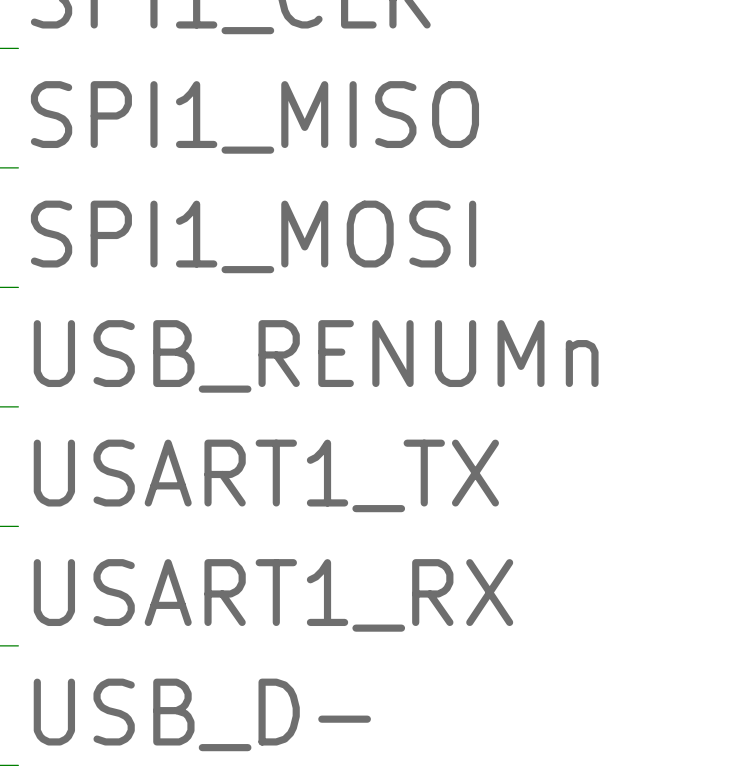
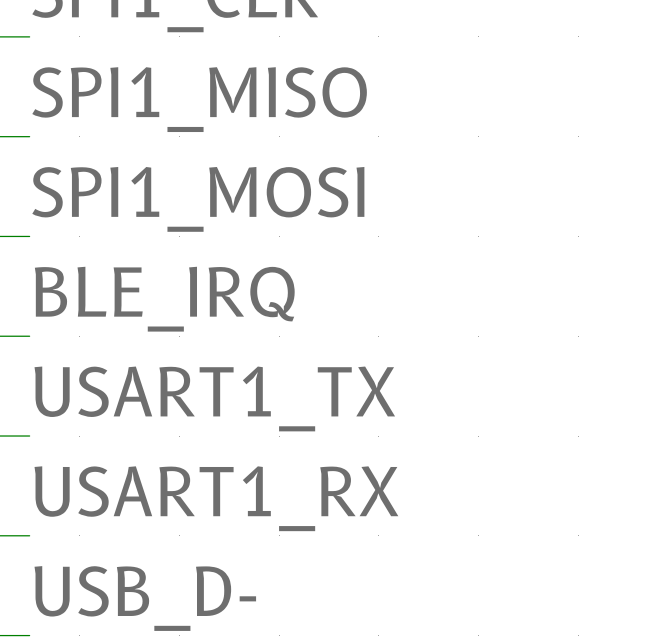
label: USB_RENUMn (316, 356) -> BLE_IRQ (164, 299)

